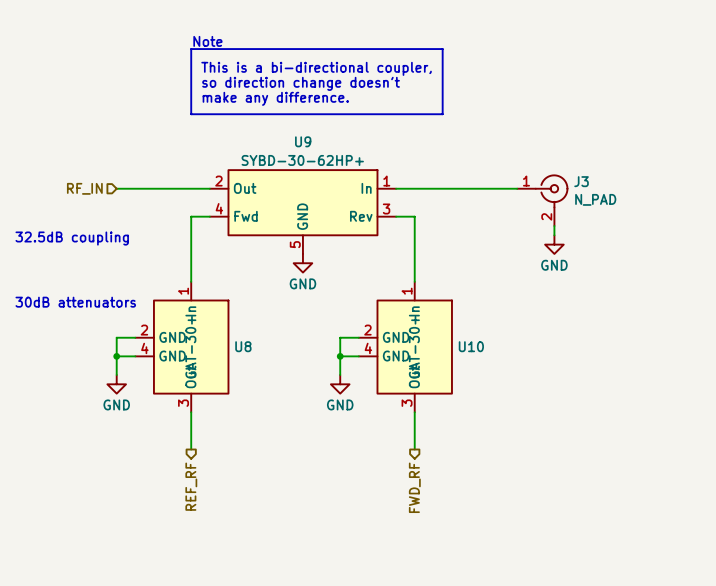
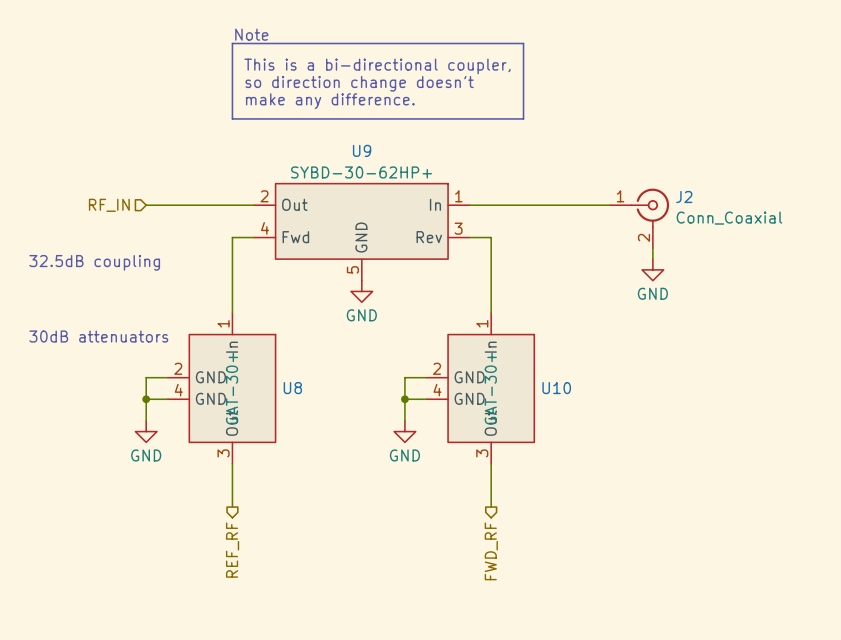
J3 name: J3 (581, 181) -> J2 (684, 197)
J3 value: N_PAD (595, 199) -> Conn_Coaxial (729, 218)

